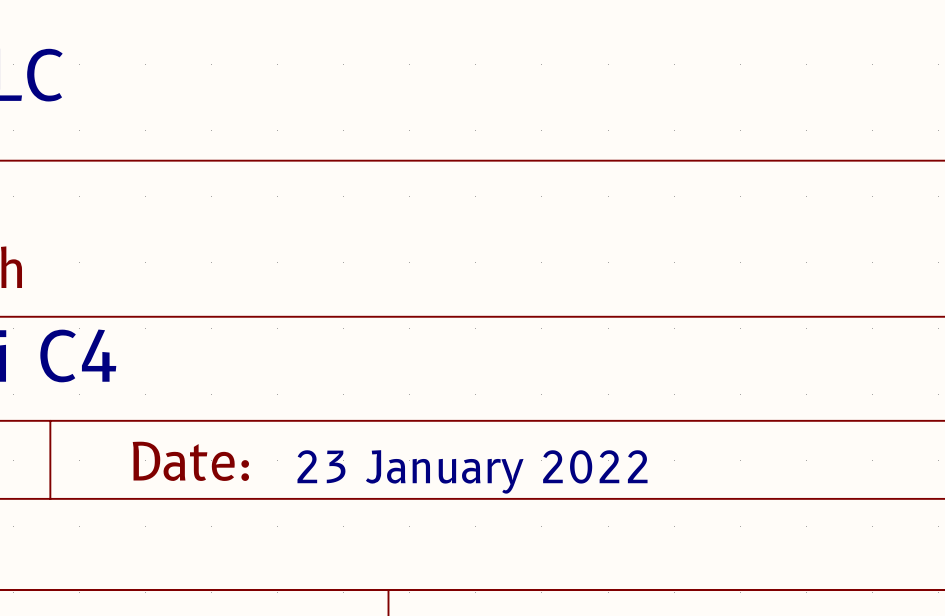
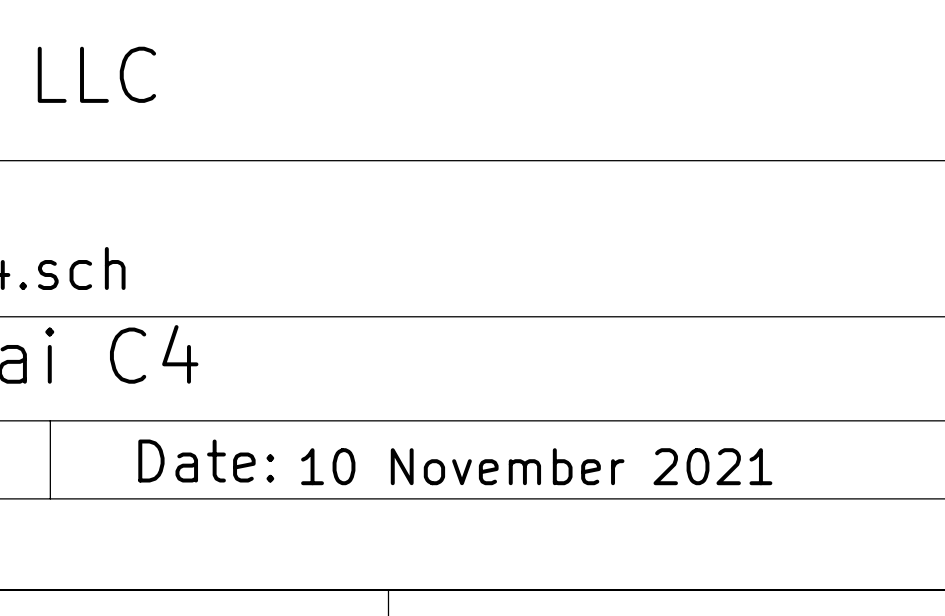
text: 23 January 2022 (472, 471) -> 10 November 2021 (536, 466)

